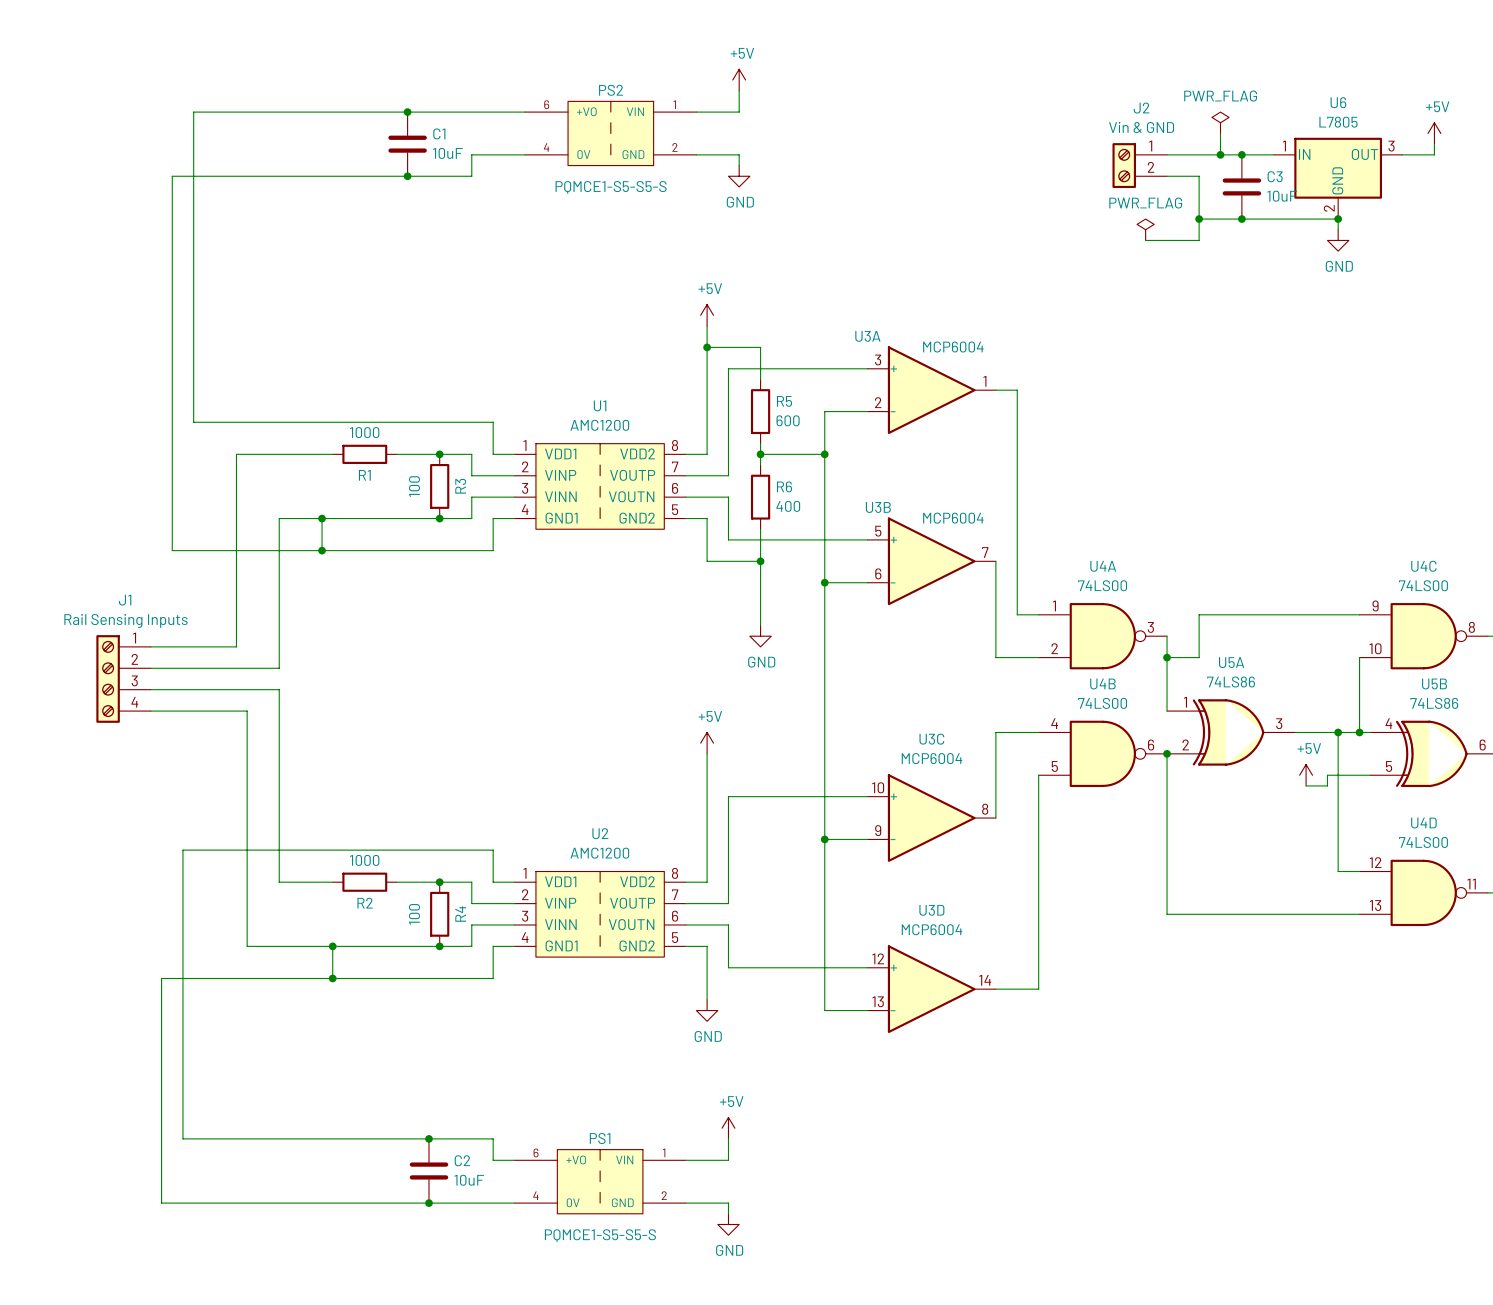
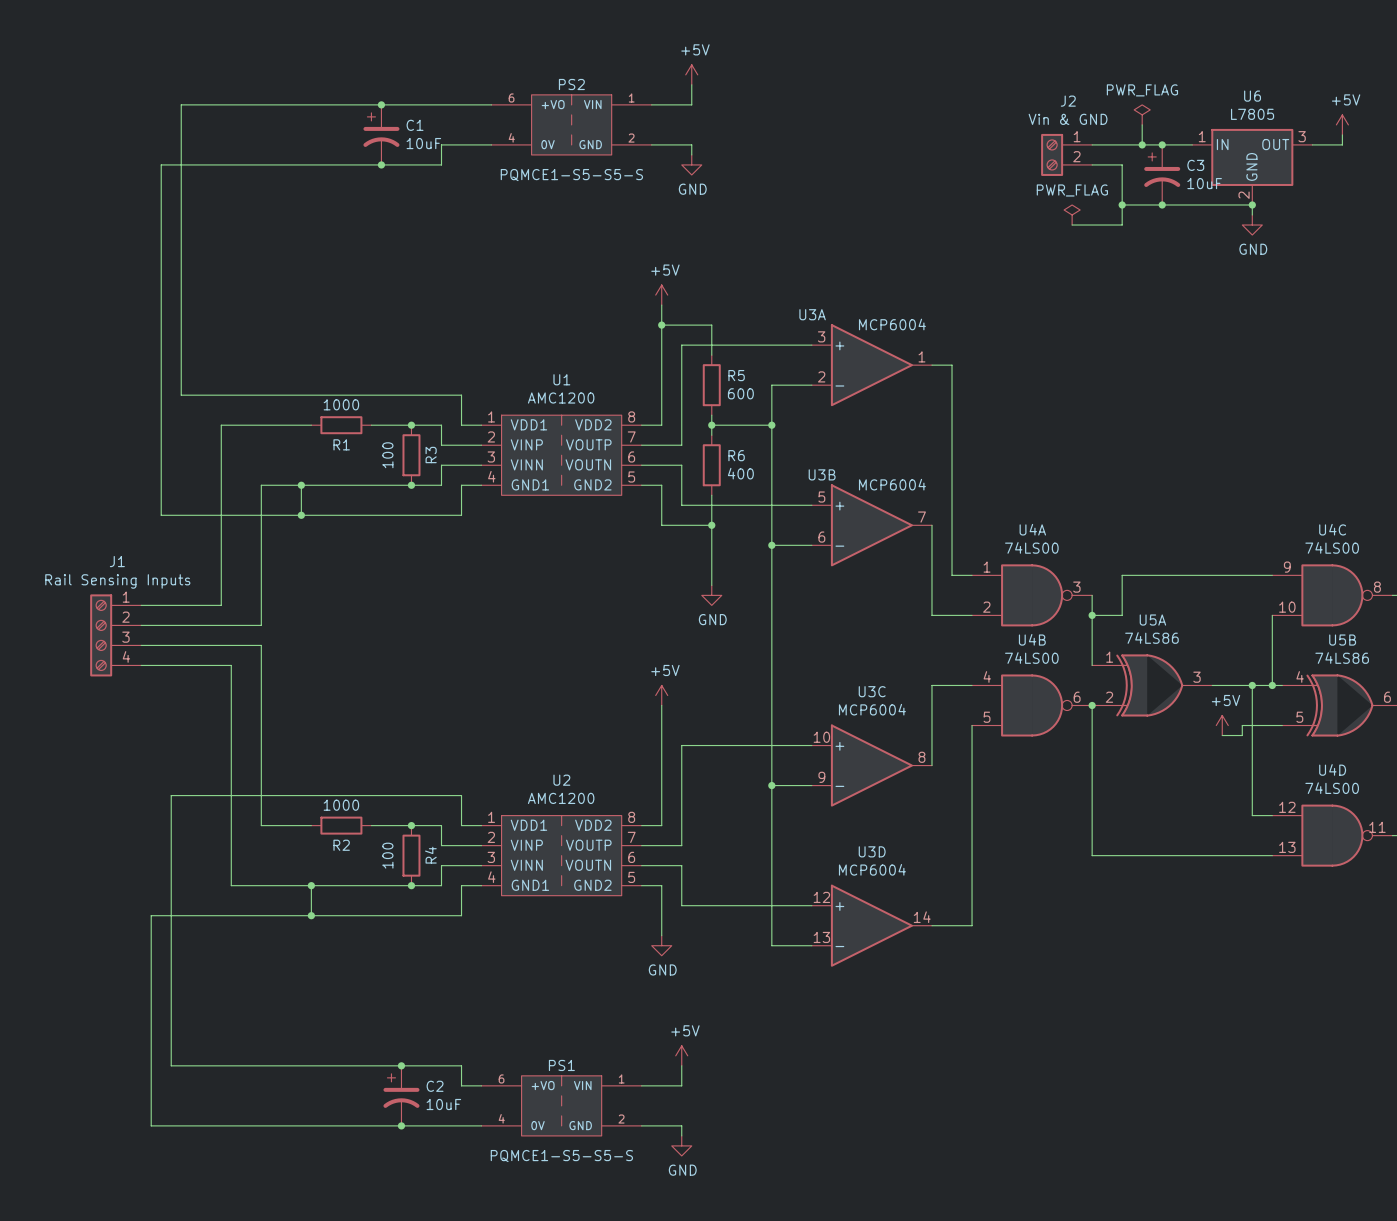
C1 symbol: [388, 112, 427, 177] -> [363, 104, 400, 165]
C3 symbol: [1222, 154, 1262, 220] -> [1144, 144, 1181, 205]
C2 symbol: [409, 1138, 449, 1204] -> [383, 1065, 420, 1126]

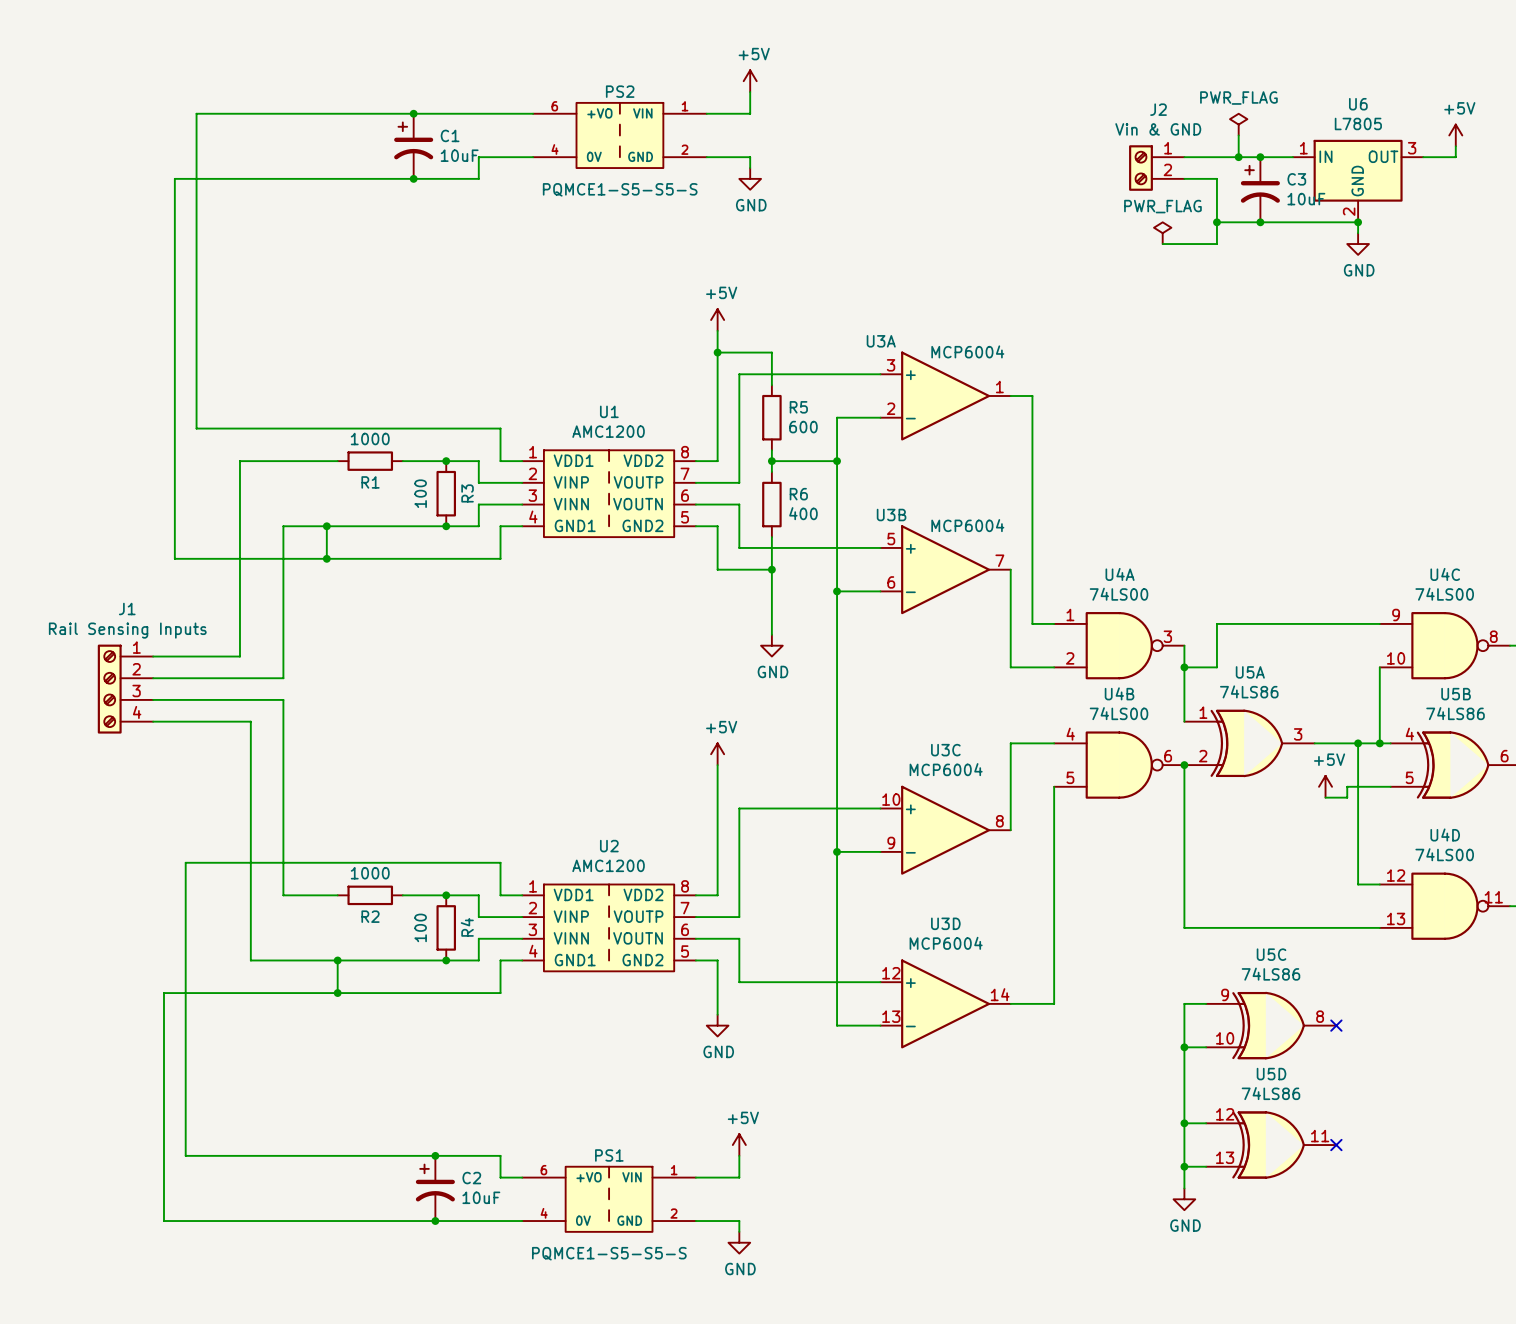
wire: none -> (1206, 1003) (1184, 1003) (1184, 1188)
U5C: none -> 74LS86 (1271, 1025)
no-connect mark: none -> (1336, 1025)
wire: none -> (1184, 1047) (1206, 1047)
junction: none -> (1184, 1047)
wire: none -> (1184, 1123) (1206, 1123)
junction: none -> (1184, 1123)
U5D: none -> 74LS86 (1271, 1145)
no-connect mark: none -> (1336, 1145)
wire: none -> (1184, 1166) (1206, 1166)
junction: none -> (1184, 1166)
power symbol: none -> GND (1184, 1199)

